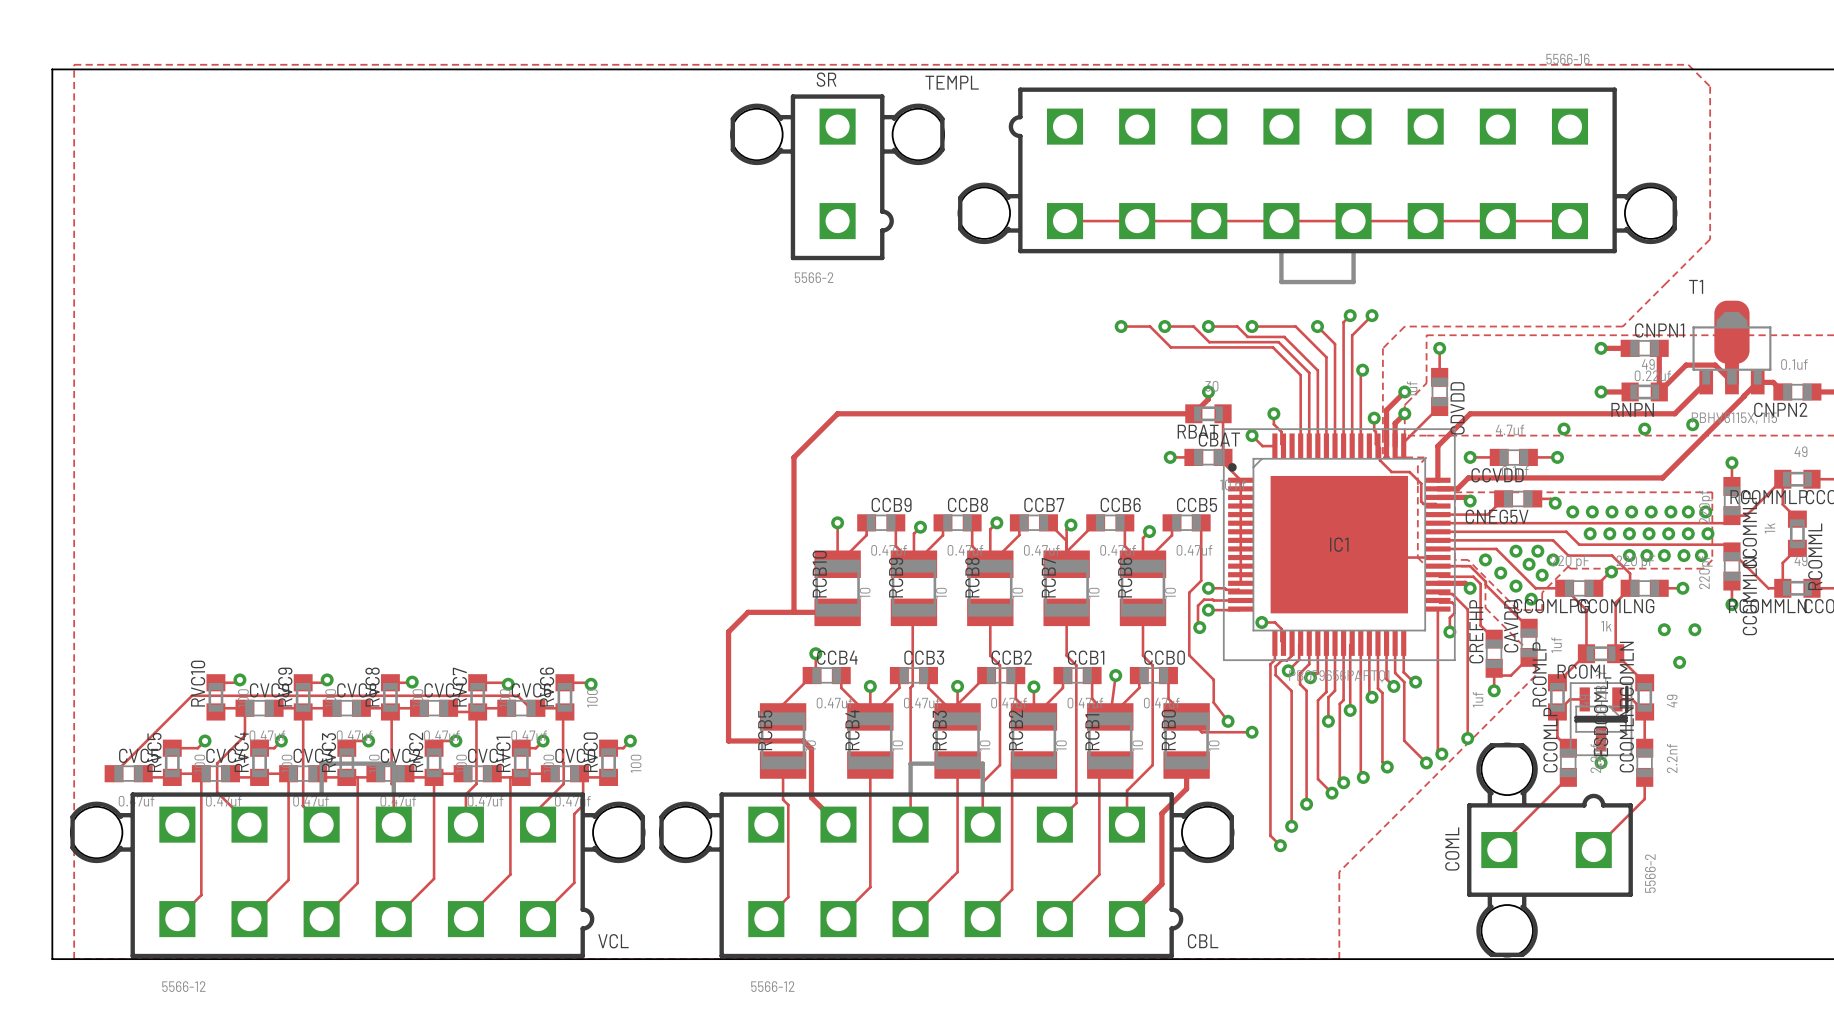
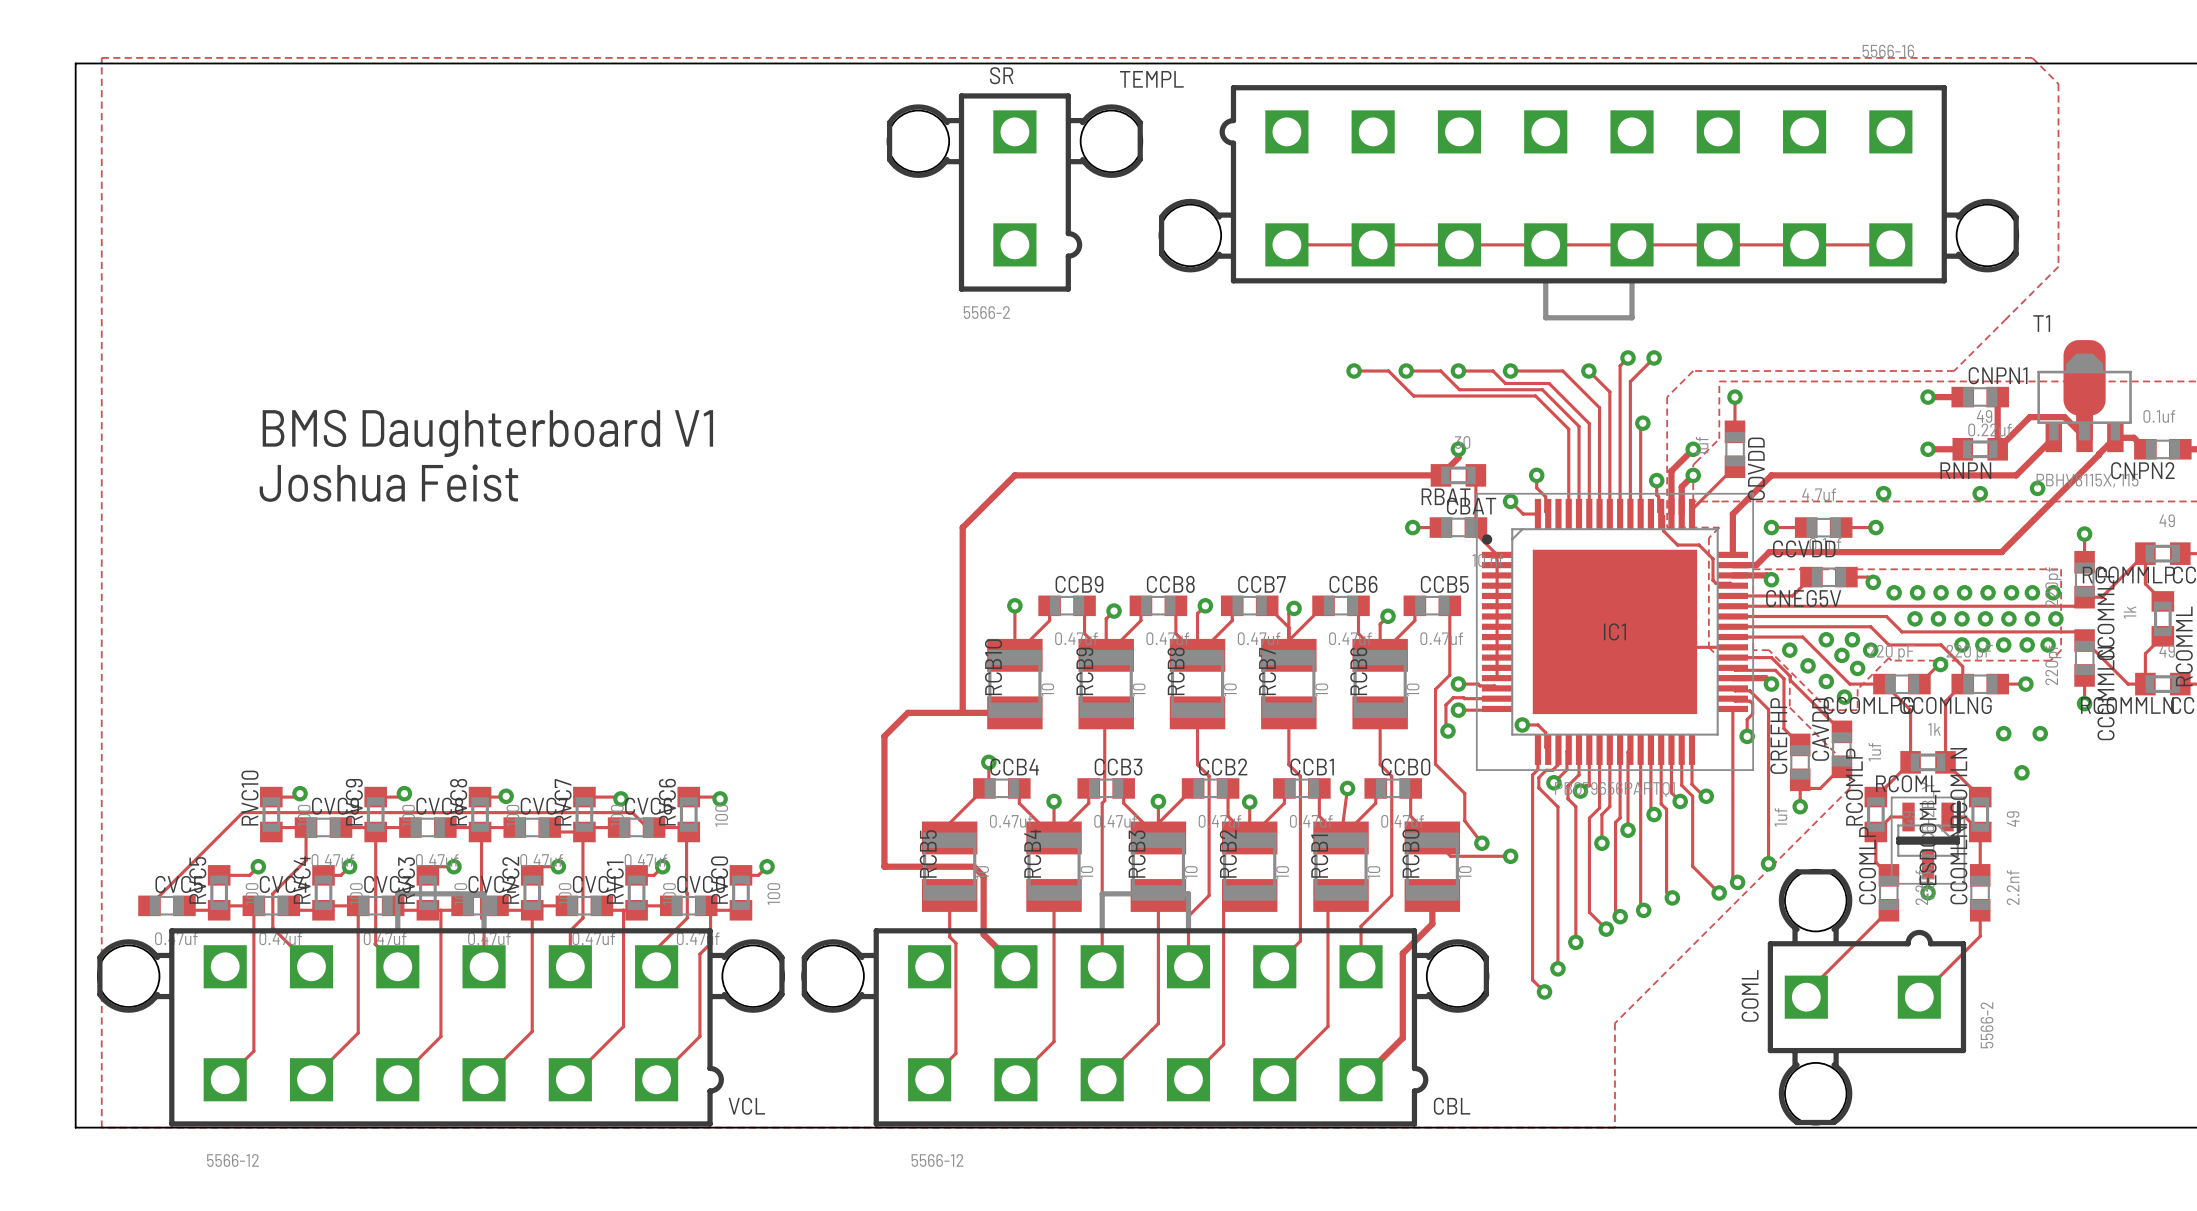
text: none -> BMS Daughterboard V1 (487, 433)
text: none -> Joshua Feist (388, 483)

